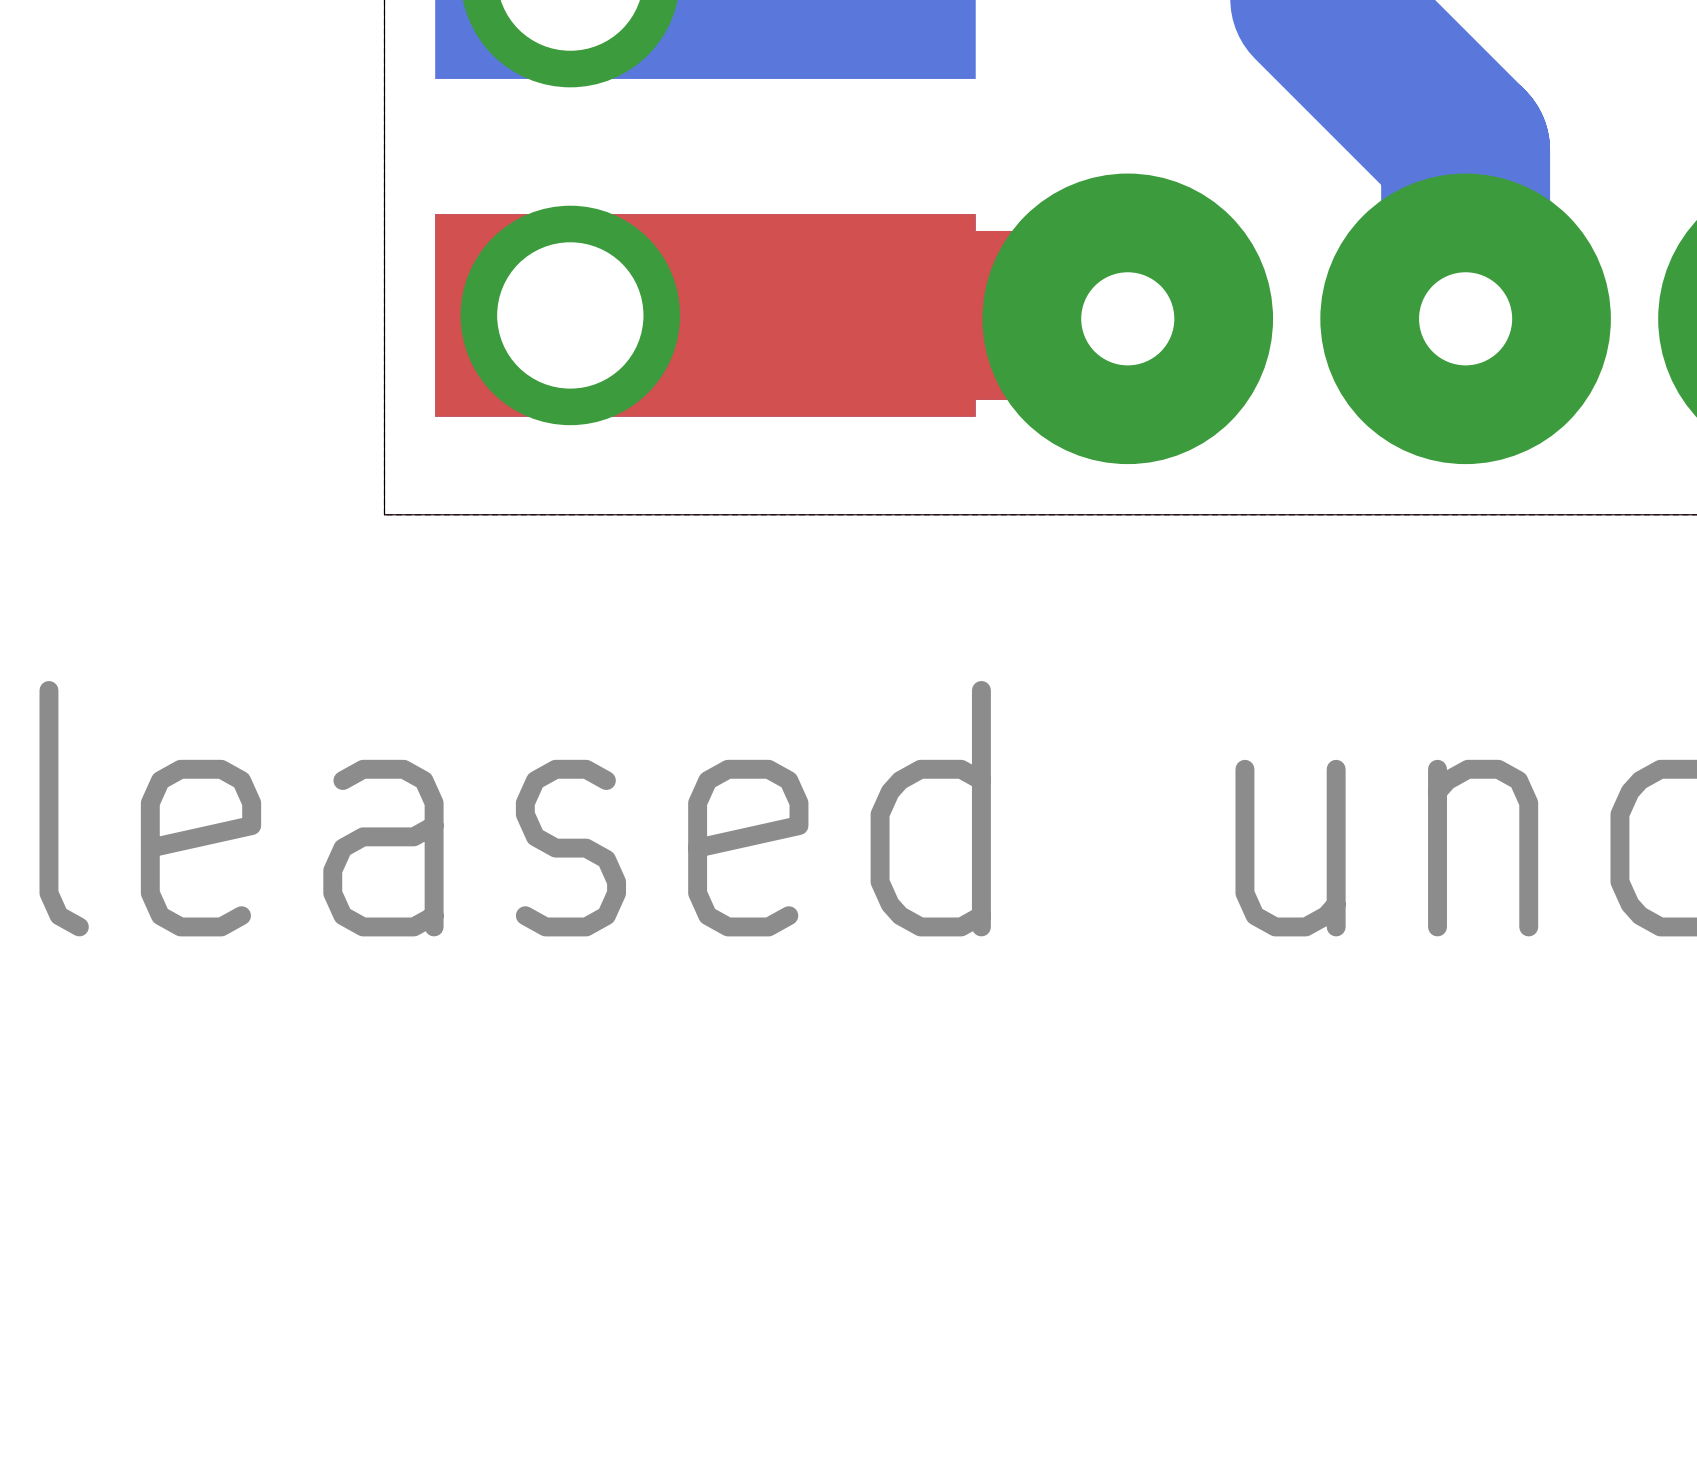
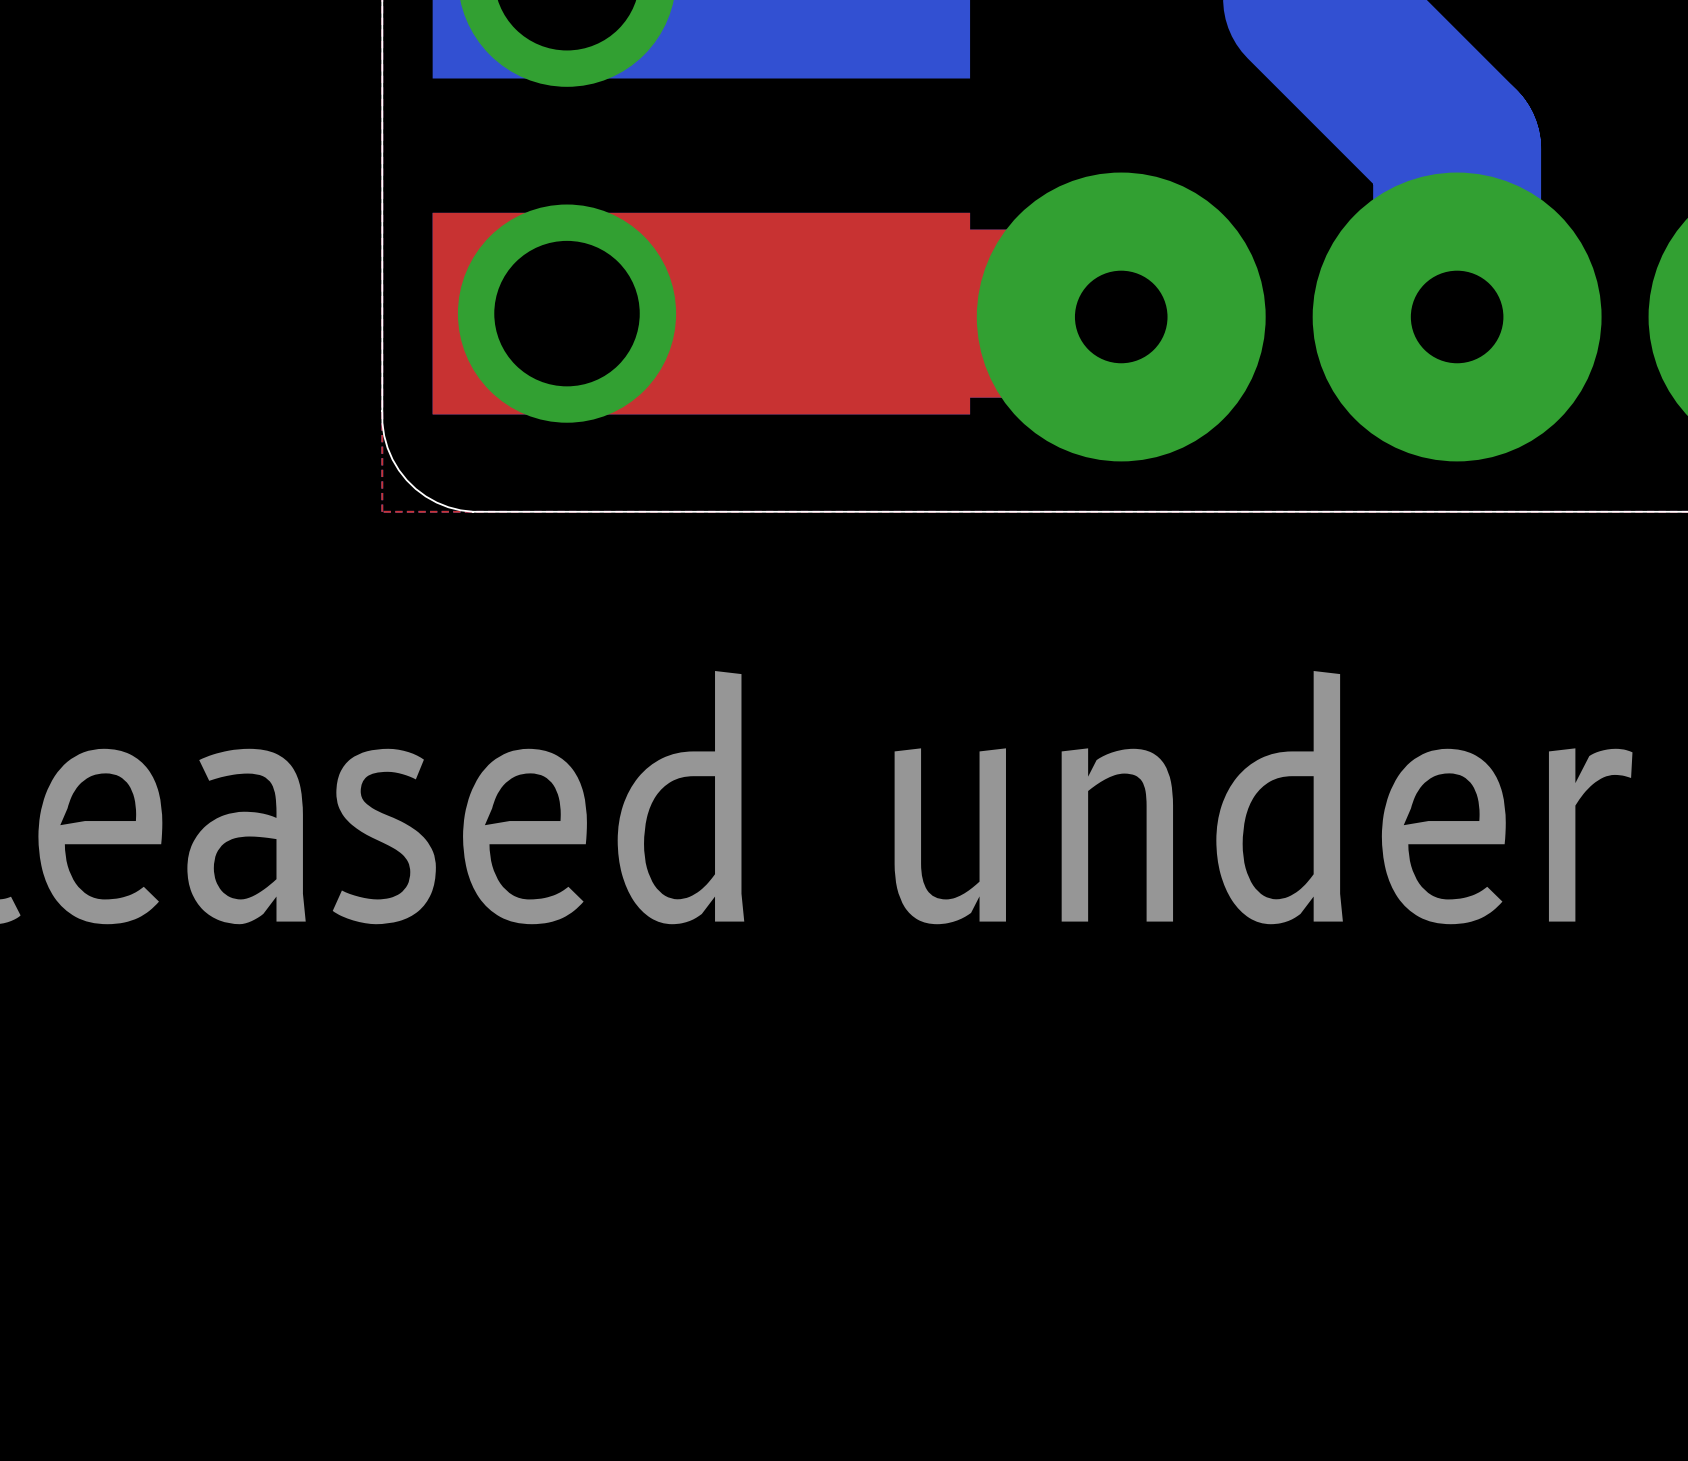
board edge: (384, 413) (384, 514) (475, 514) -> (382, 411) (382, 423) (387, 448) (392, 459) (406, 480) (425, 496) (436, 502) (448, 507) (472, 511)

